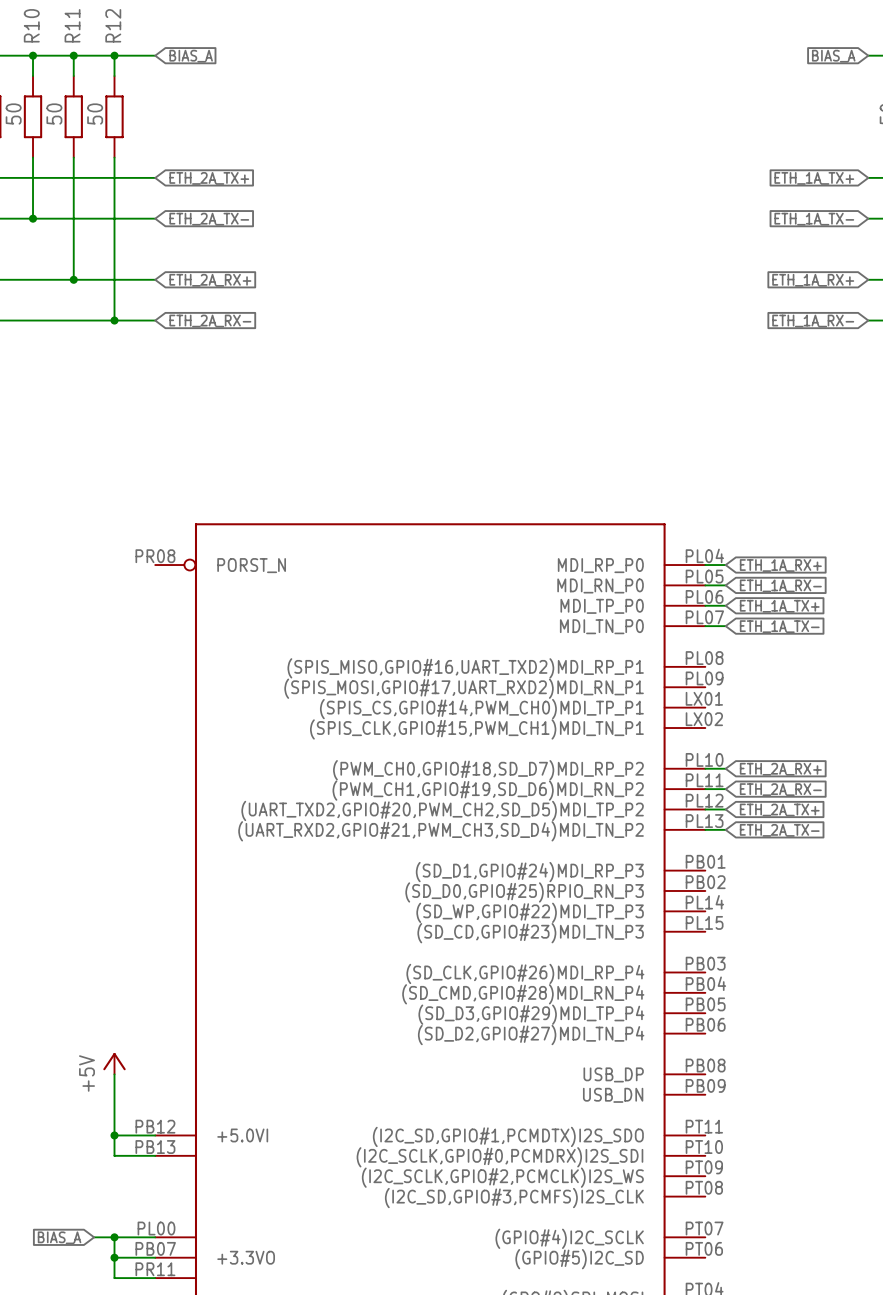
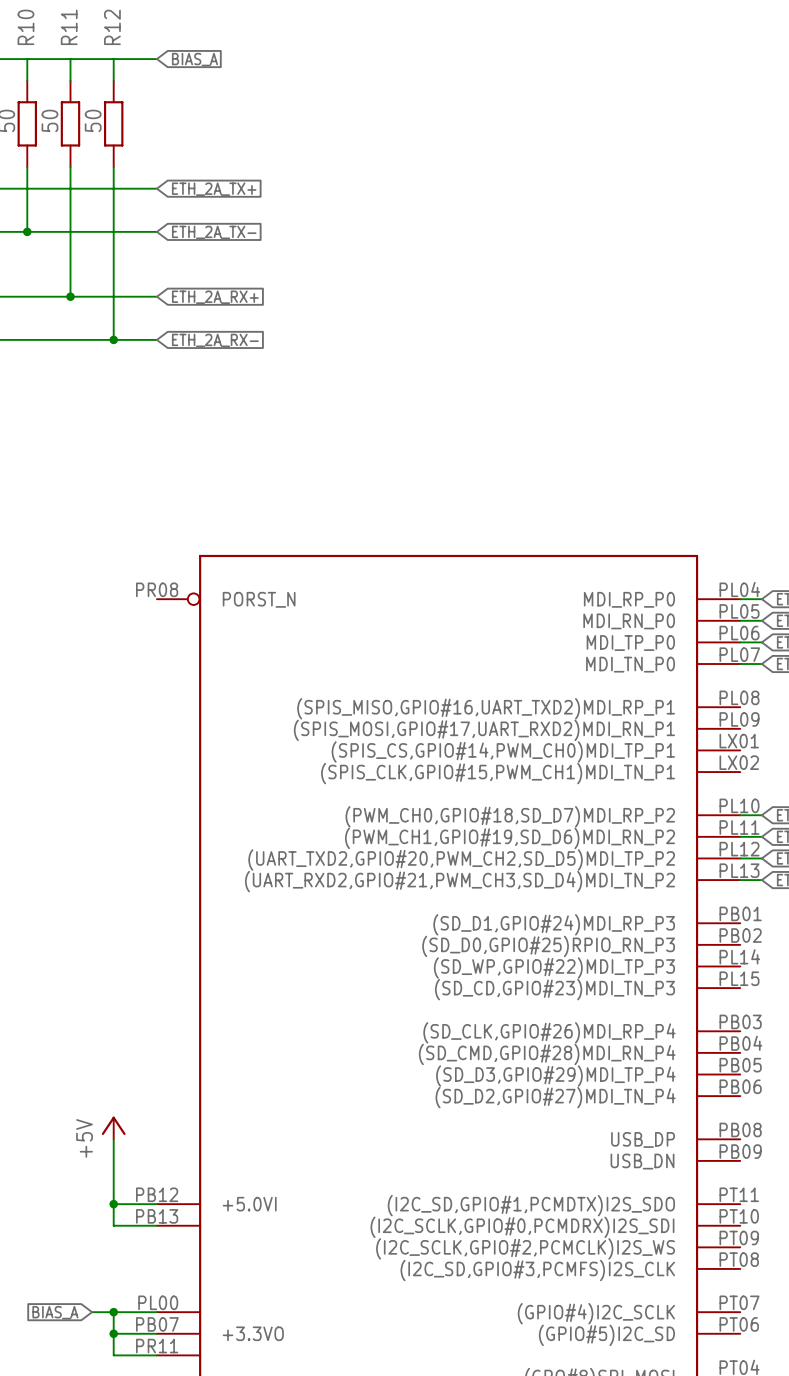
junction: (33, 55) -> none
junction: (73, 55) -> none
junction: (114, 55) -> none

